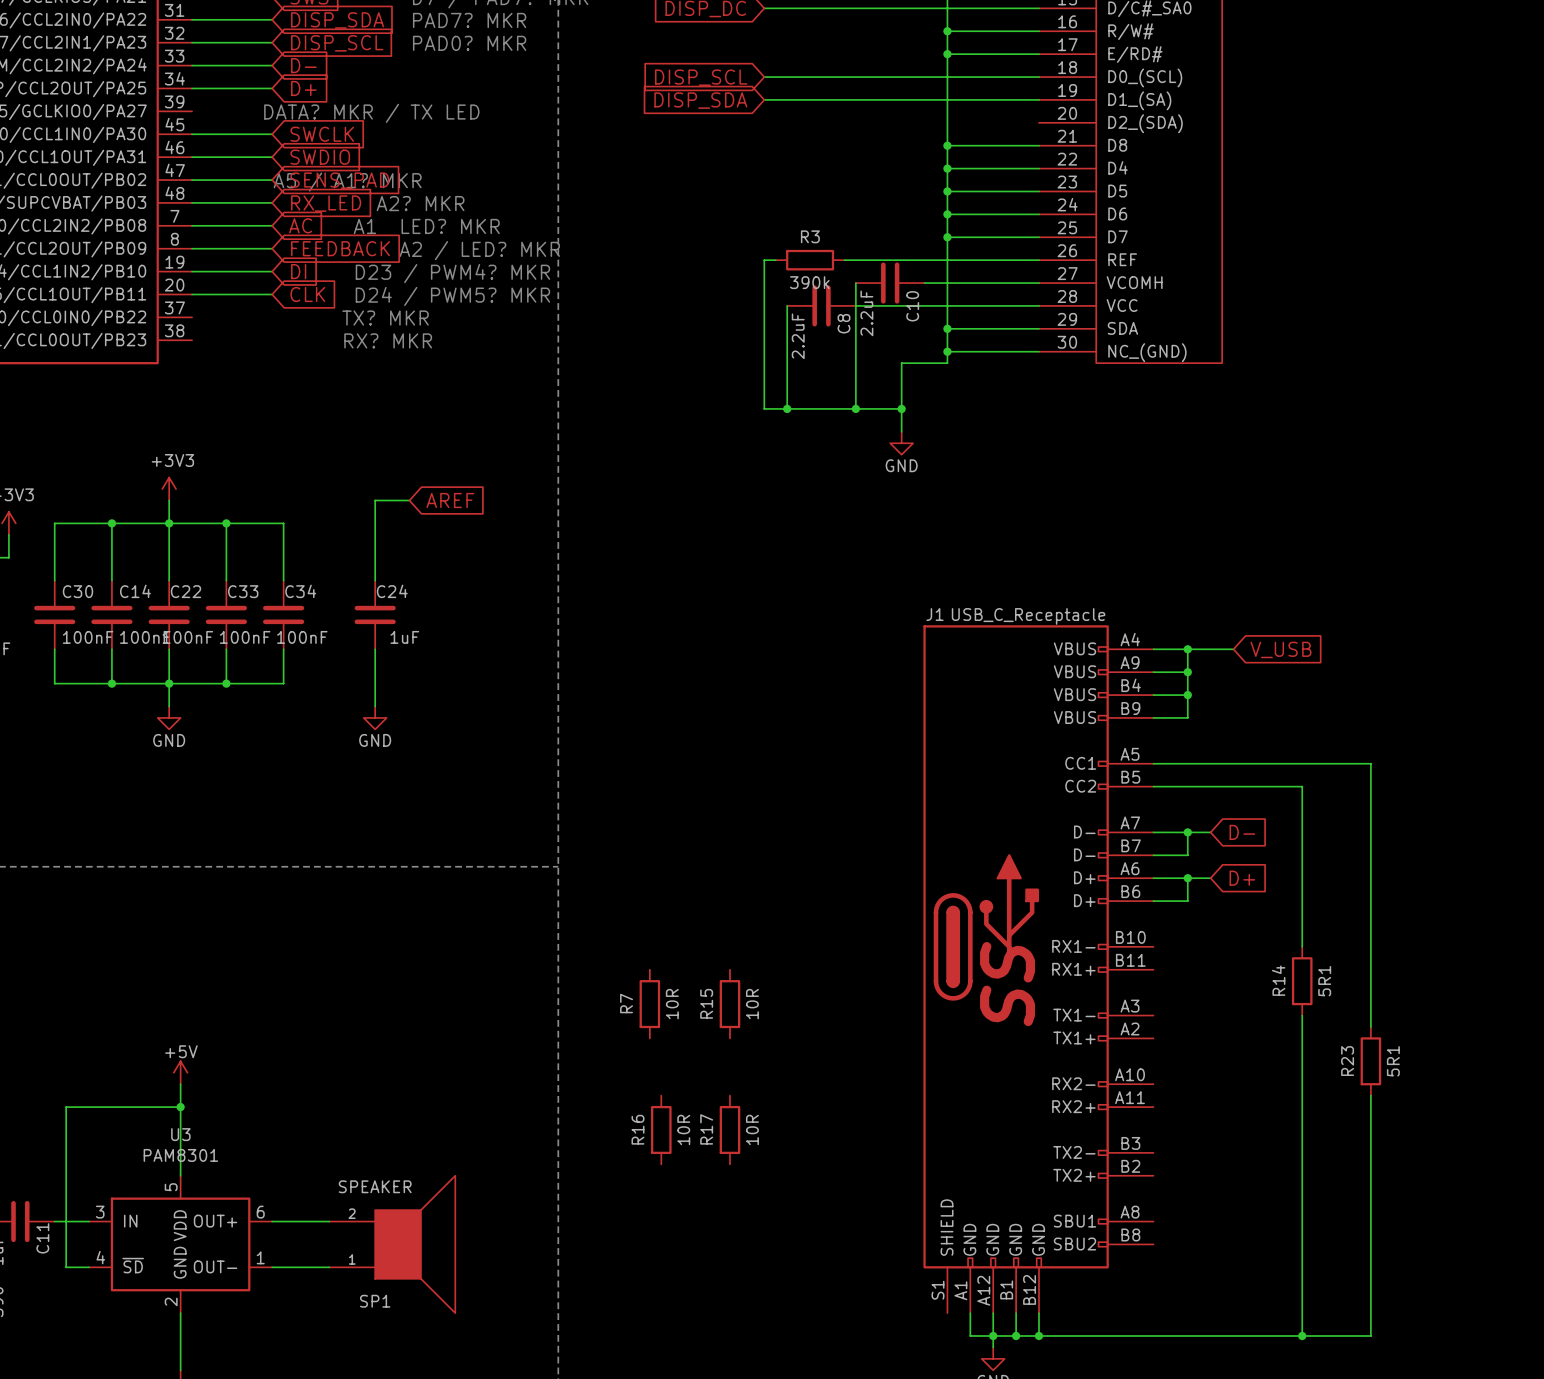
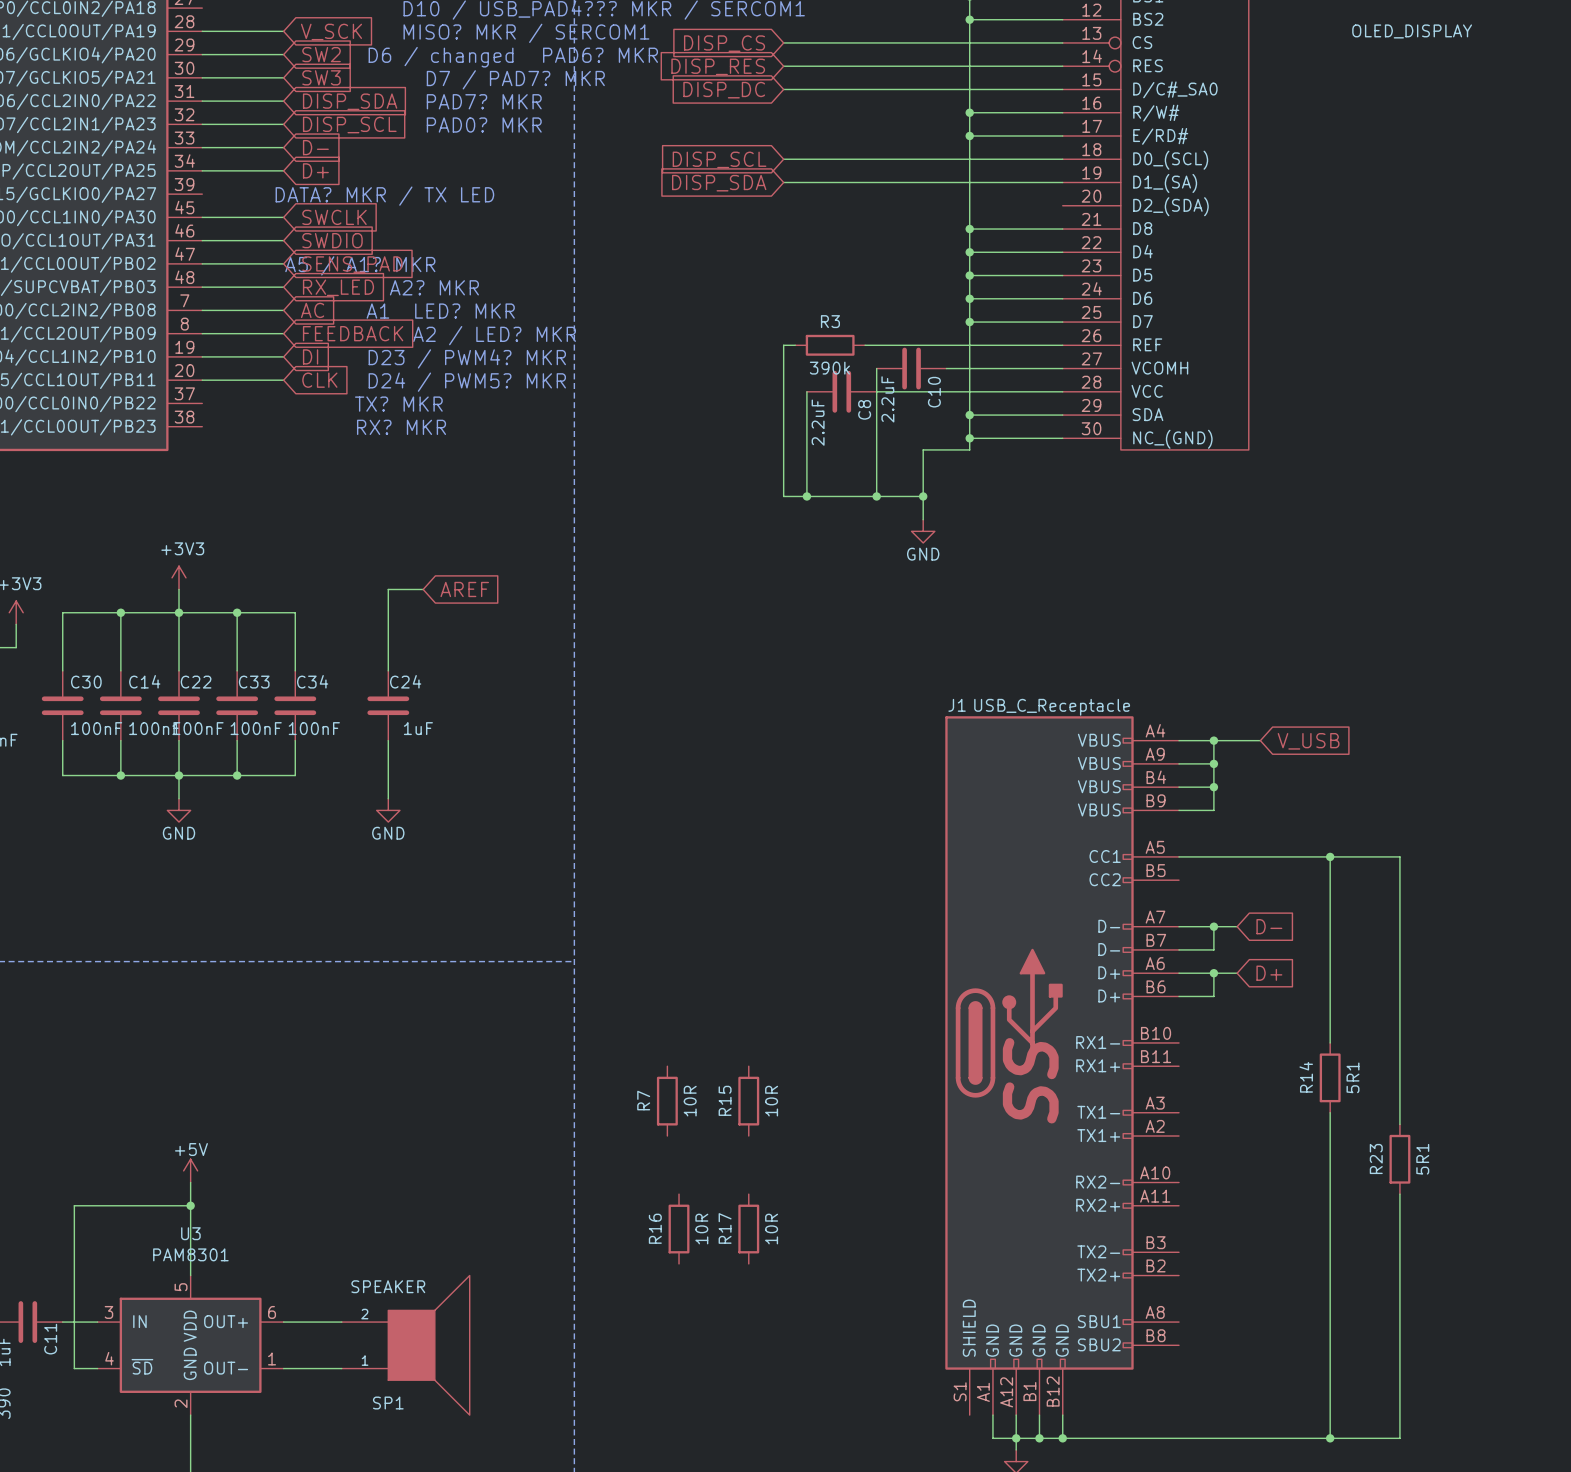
junction: none -> (1330, 856)
wire: (1153, 786) (1302, 786) -> (1330, 856) (1330, 880)

